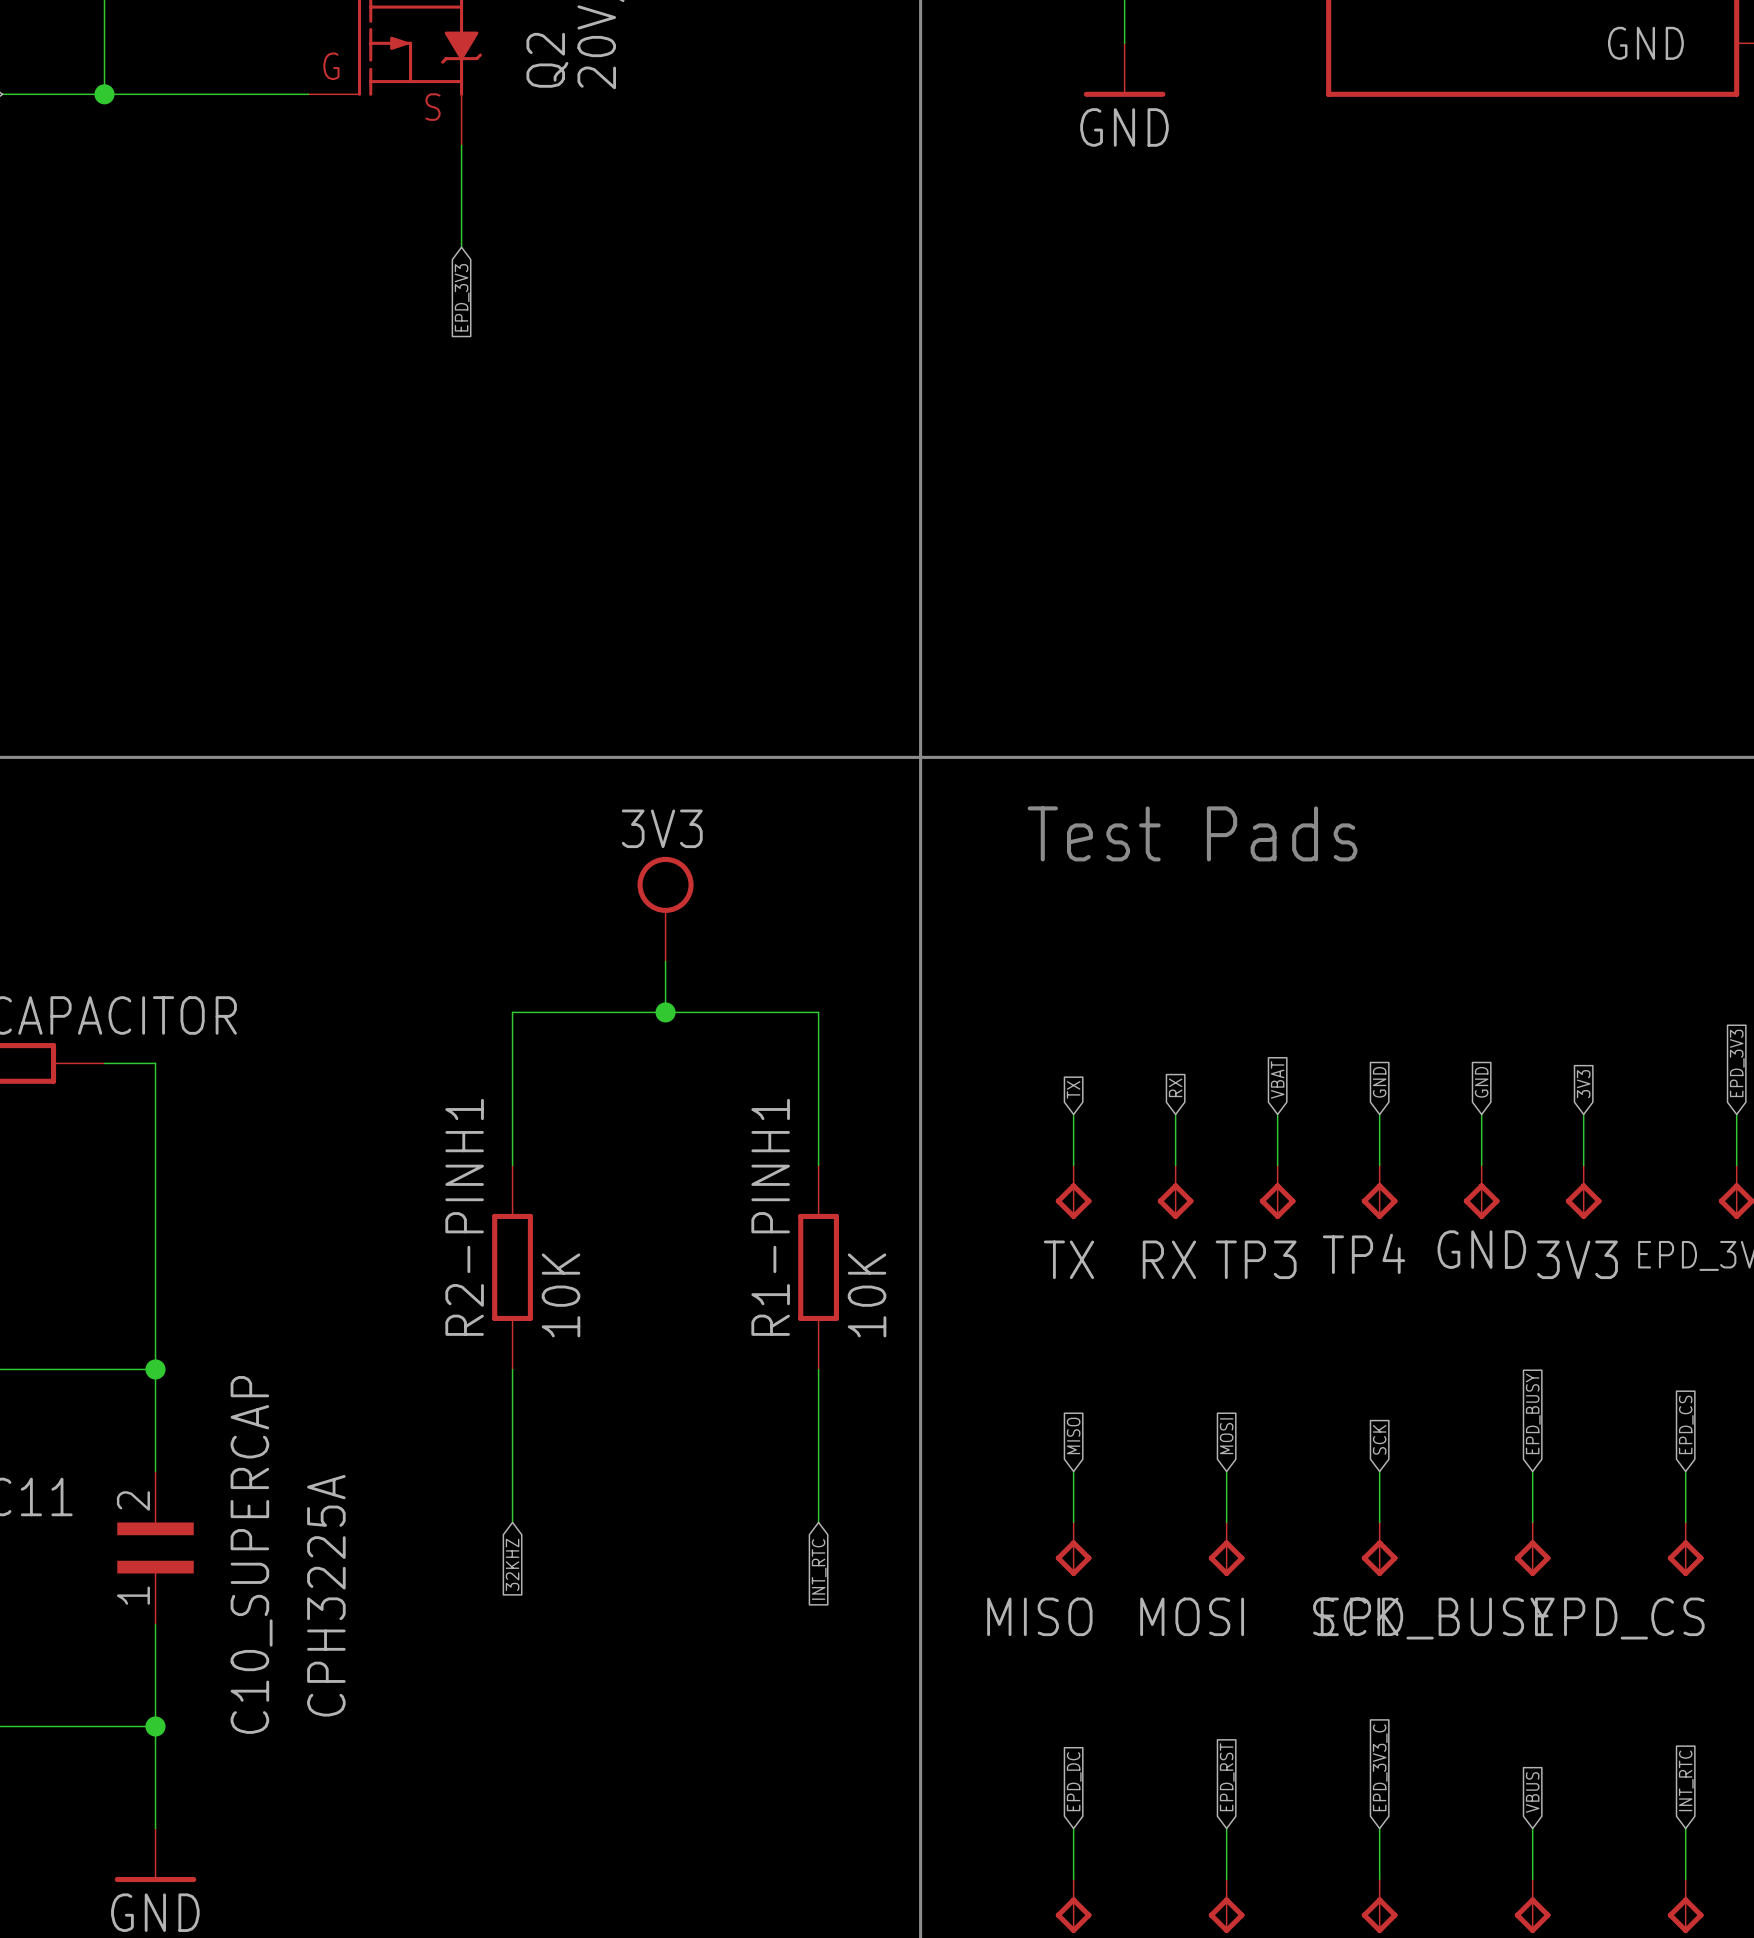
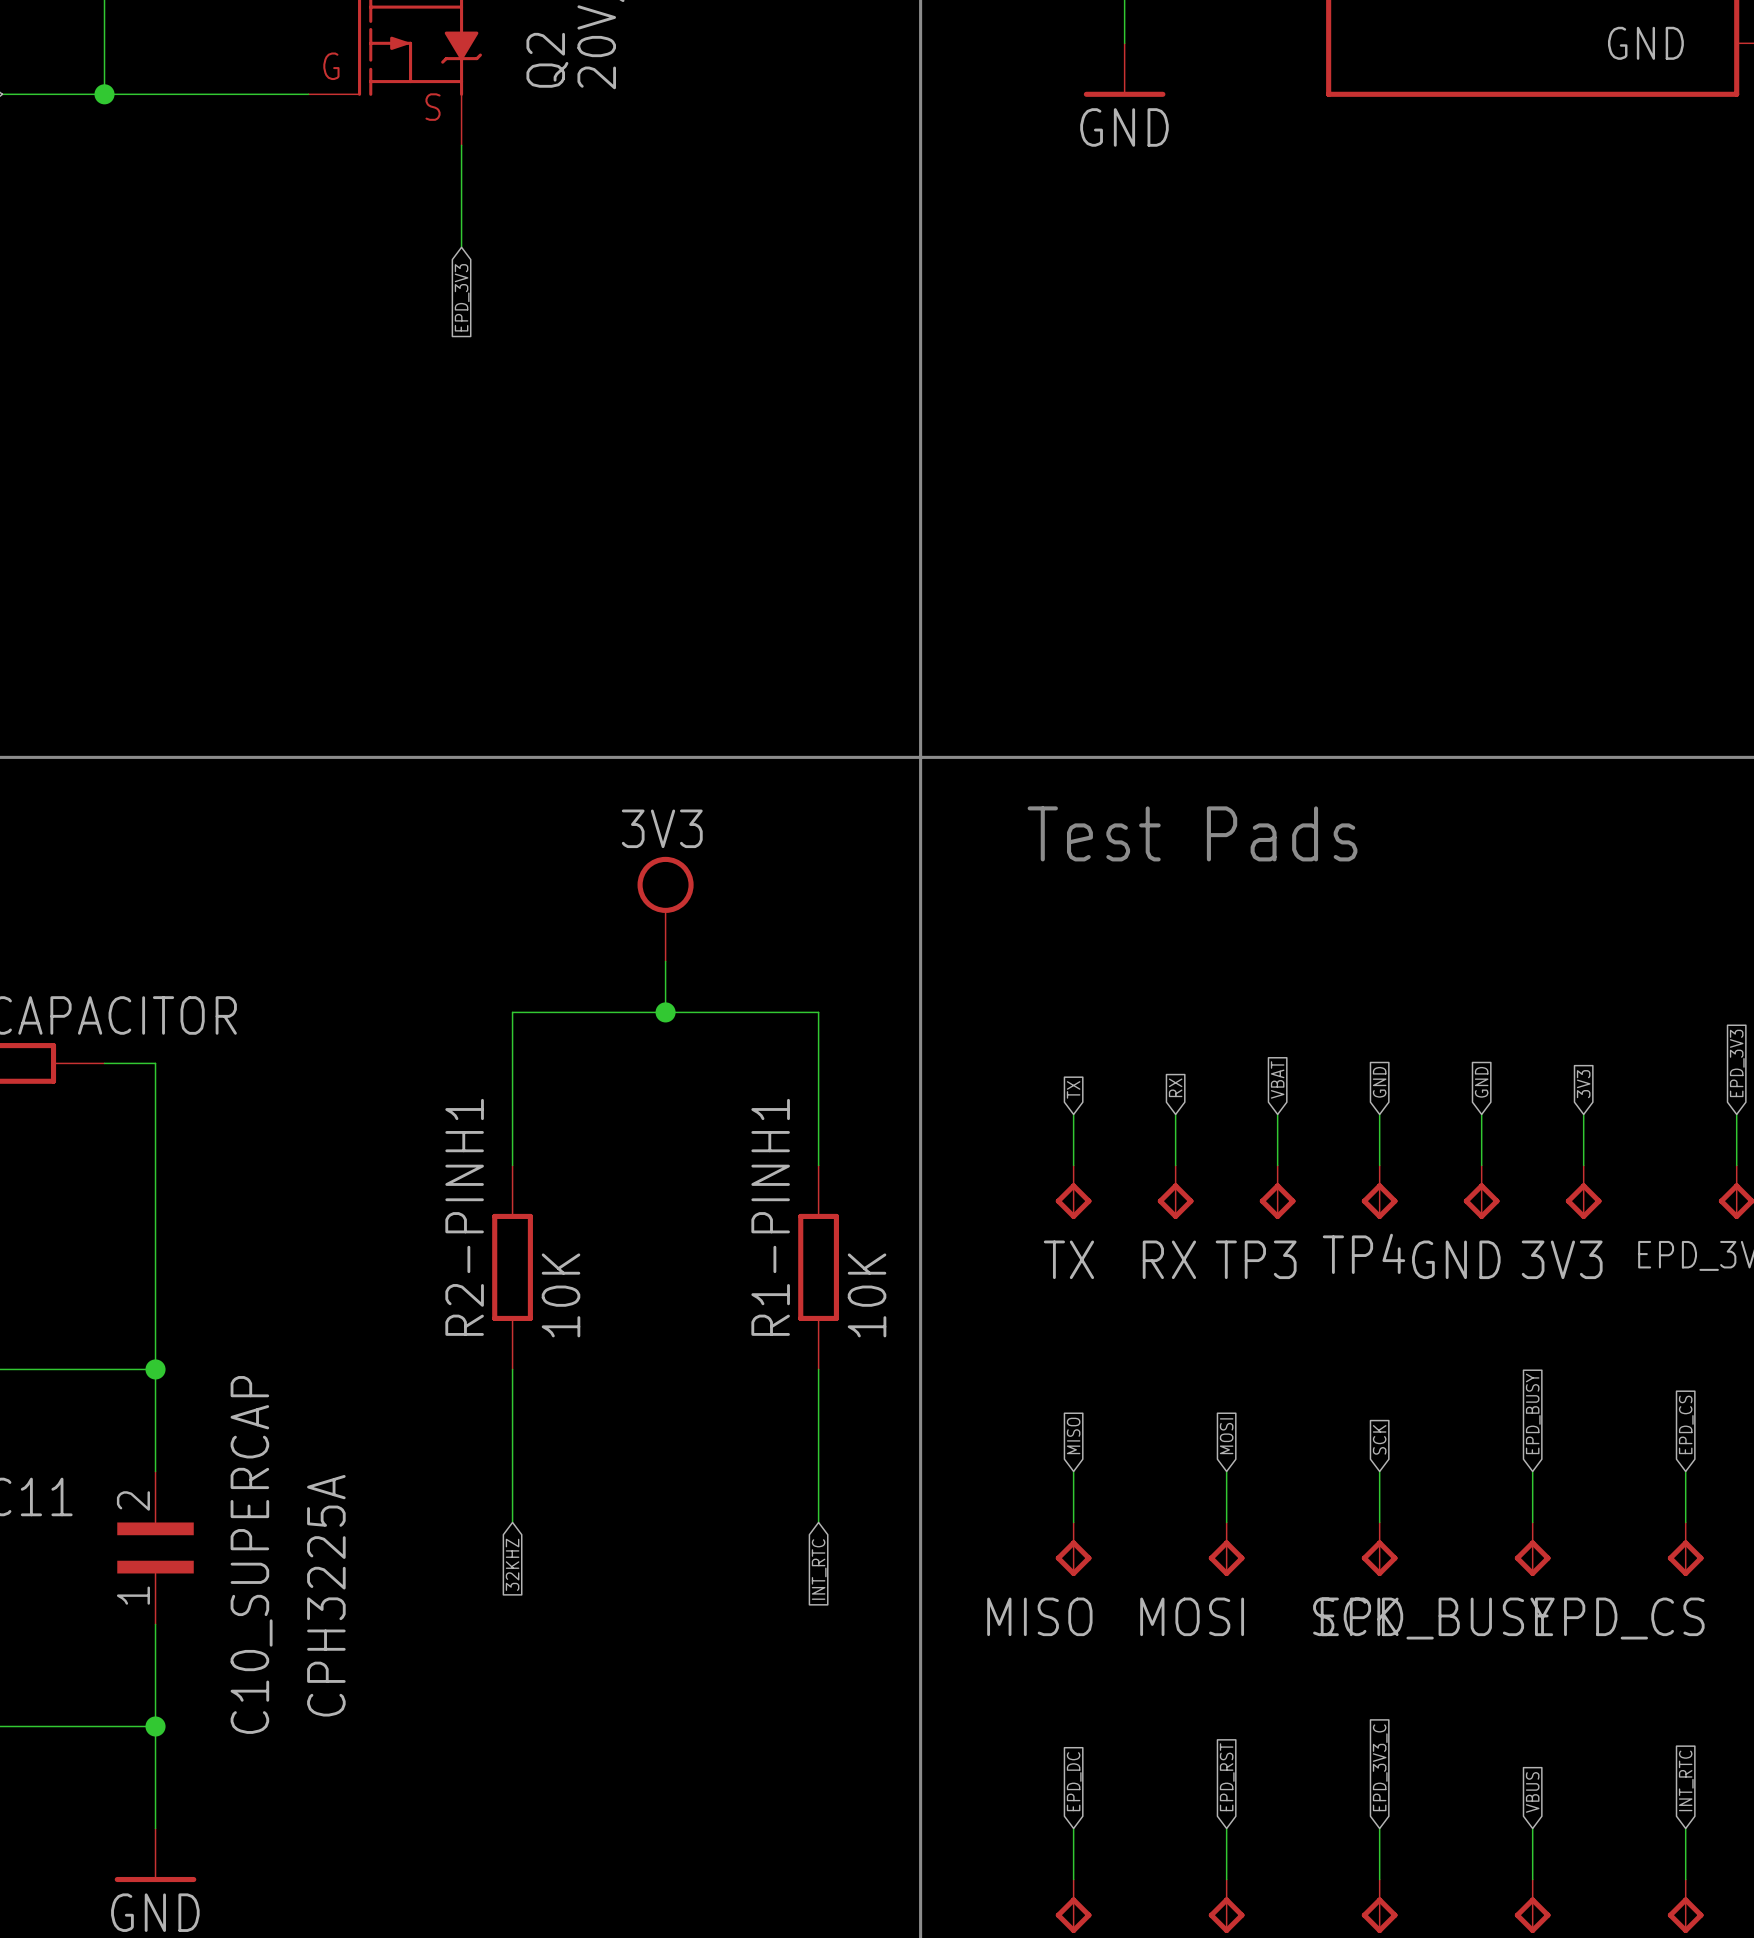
GND name position: GND (1481, 1249) -> GND (1456, 1259)
3V3 name position: 3V3 (1577, 1259) -> 3V3 (1562, 1259)

